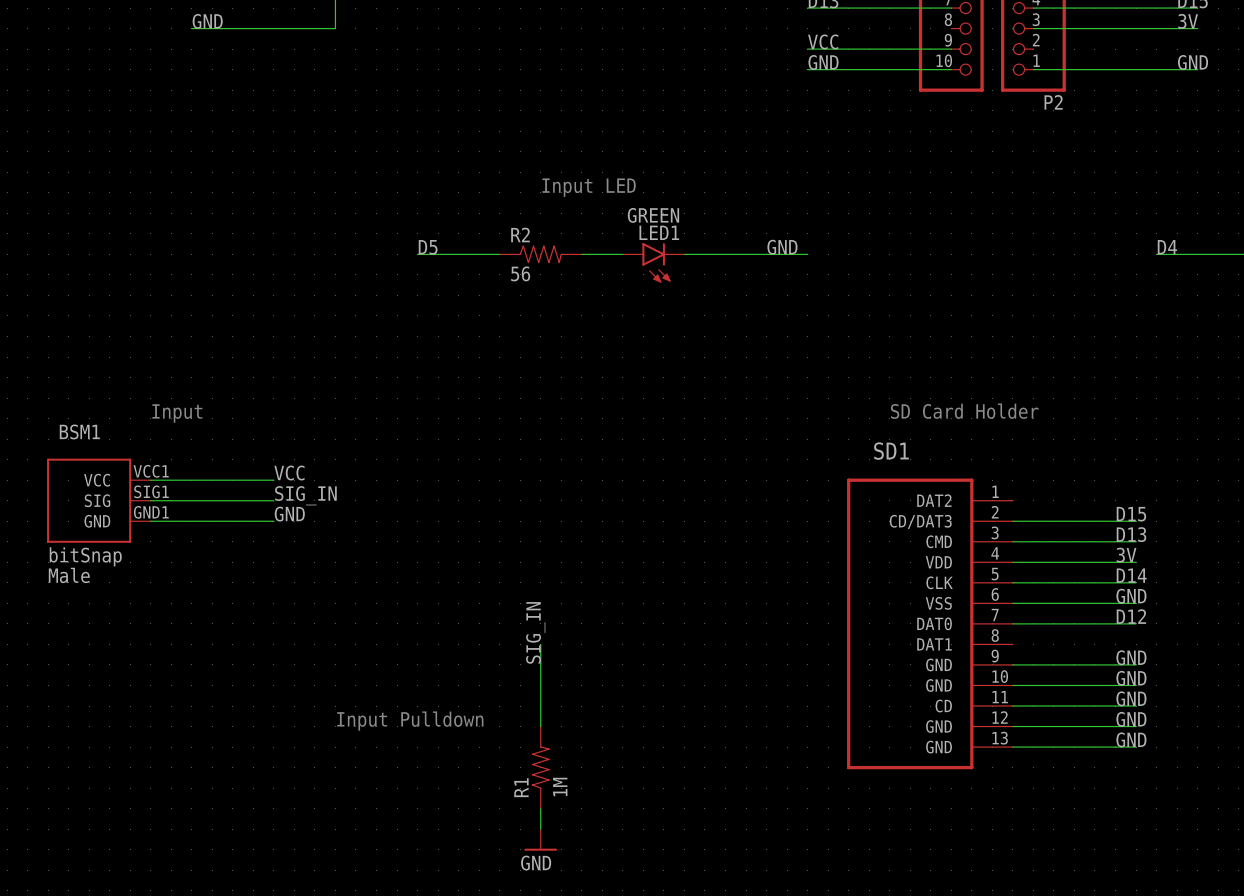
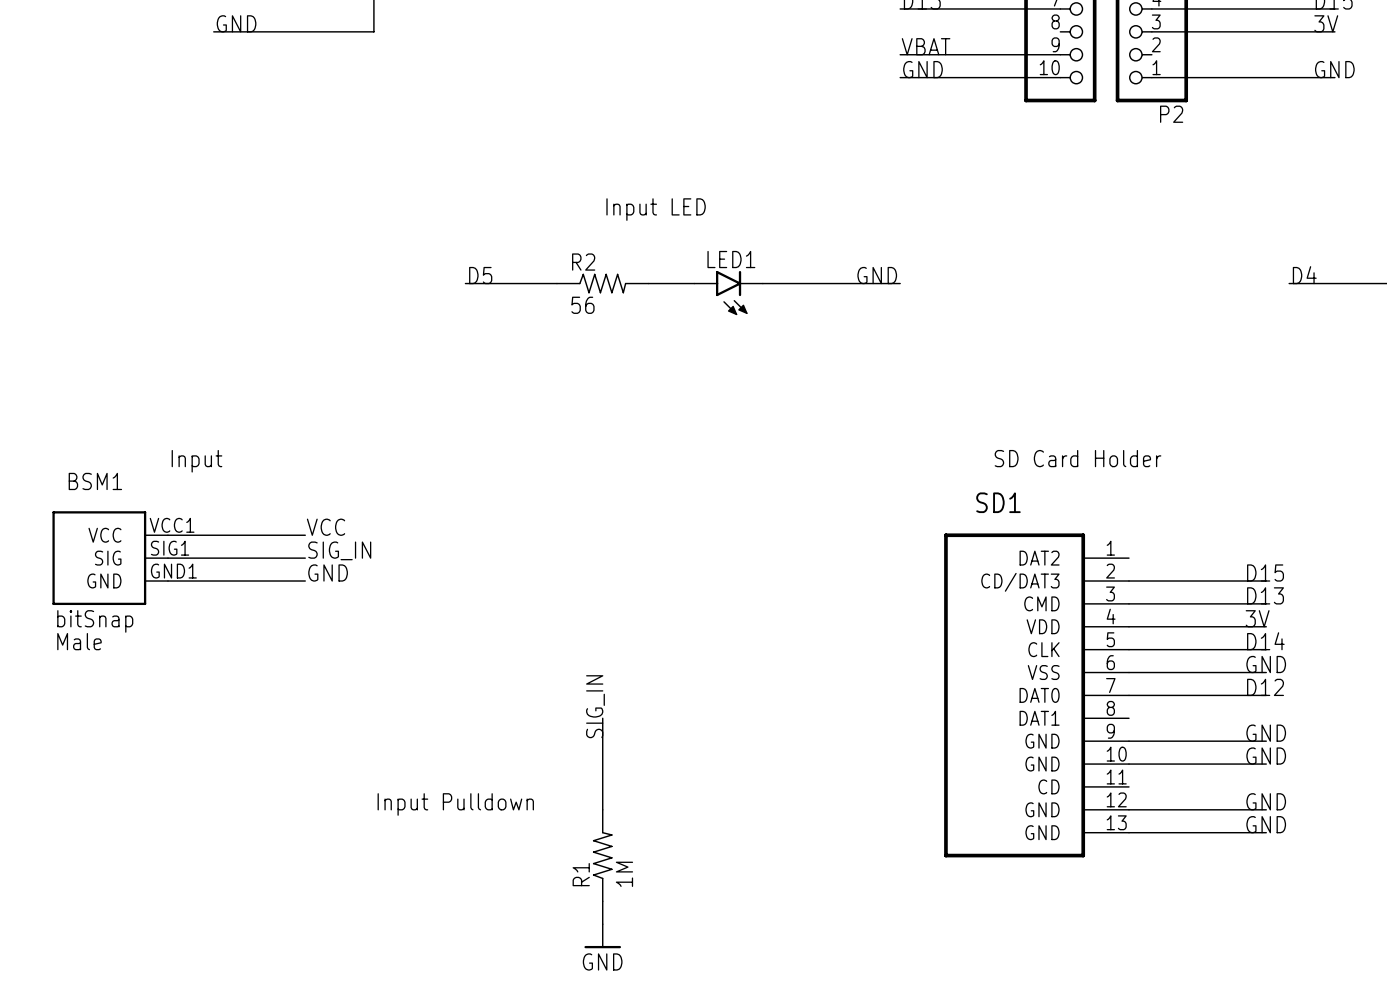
label: VCC (823, 41) -> VBAT (926, 46)
LED1 value: GREEN (653, 215) -> none
label: GND (1131, 698) -> none
wire: (1012, 706) (1136, 706) -> none

